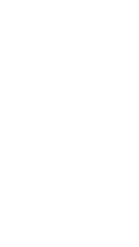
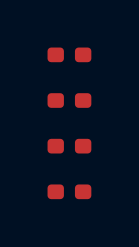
part: none -> (69, 54)
part: none -> (69, 100)
part: none -> (69, 146)
part: none -> (69, 191)

